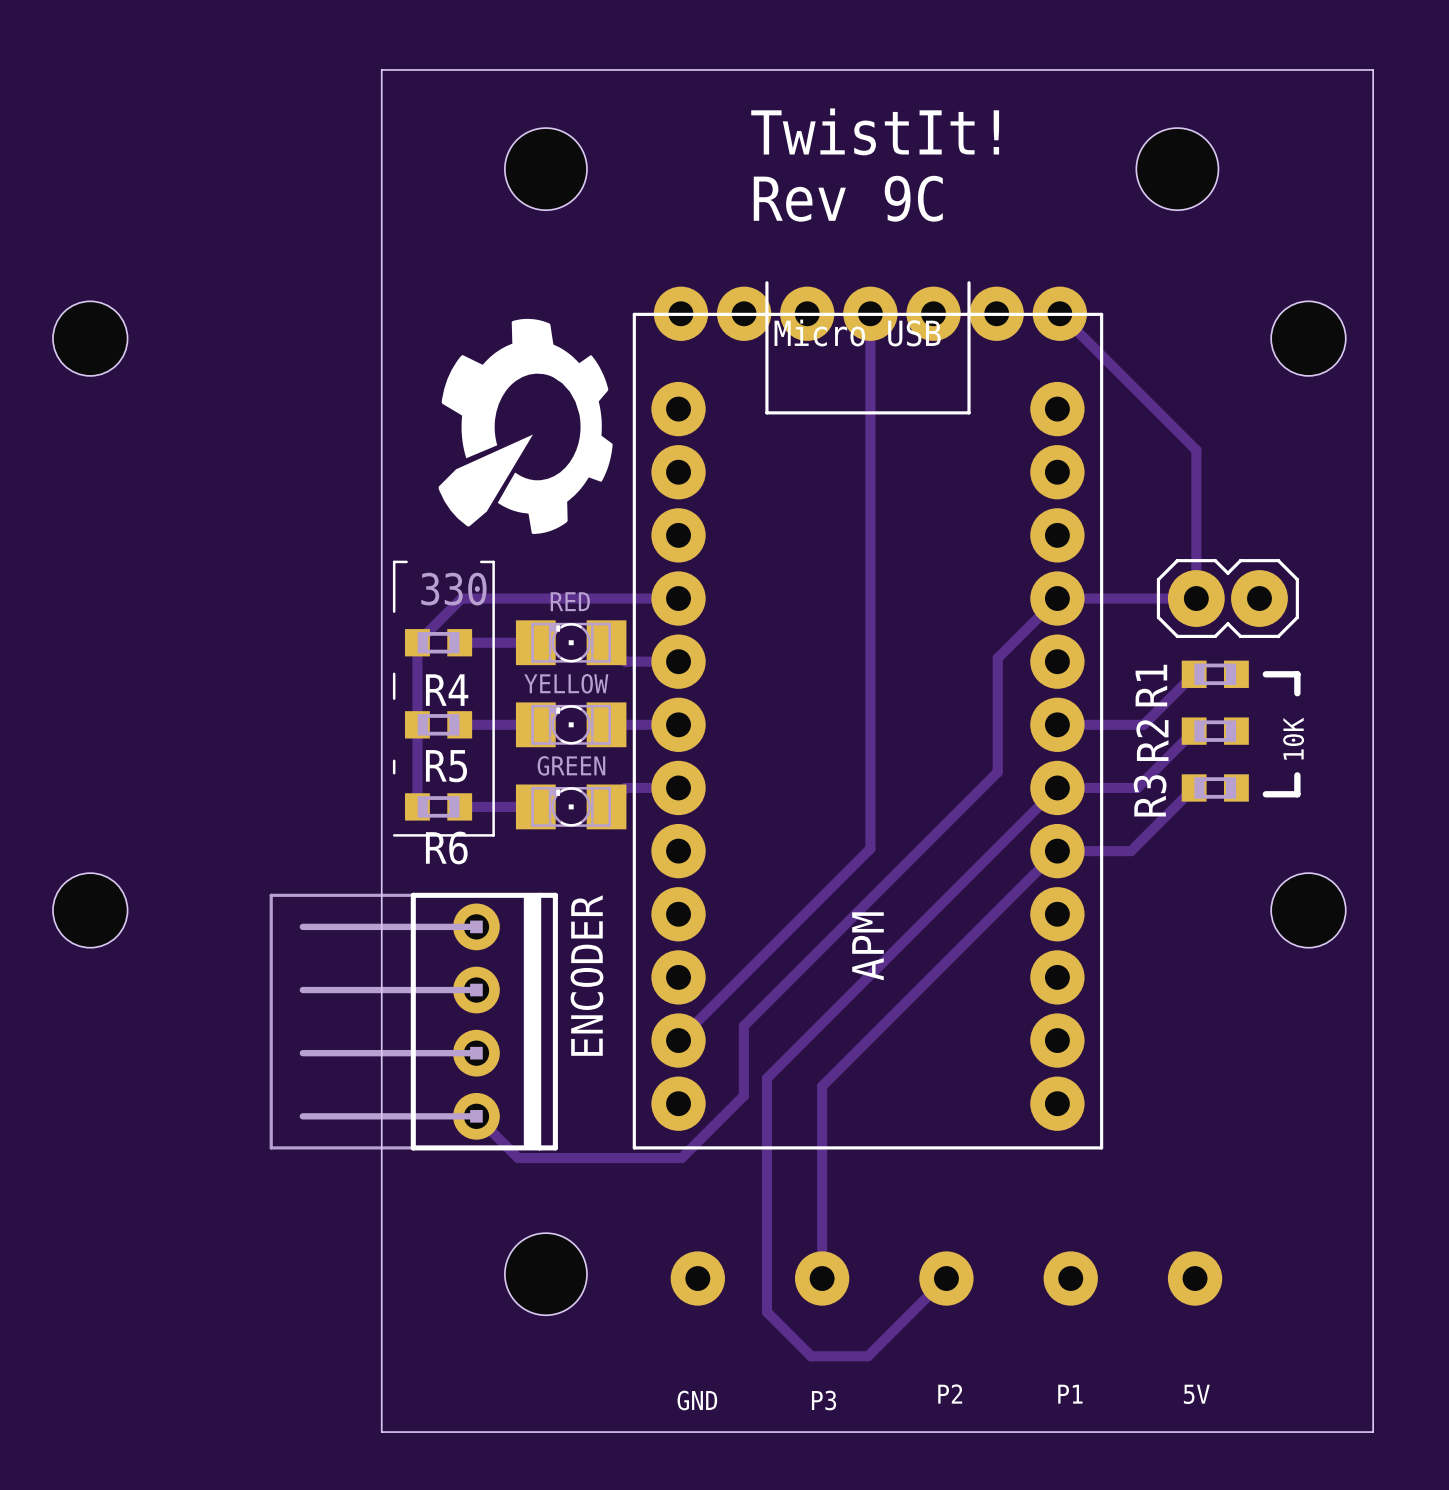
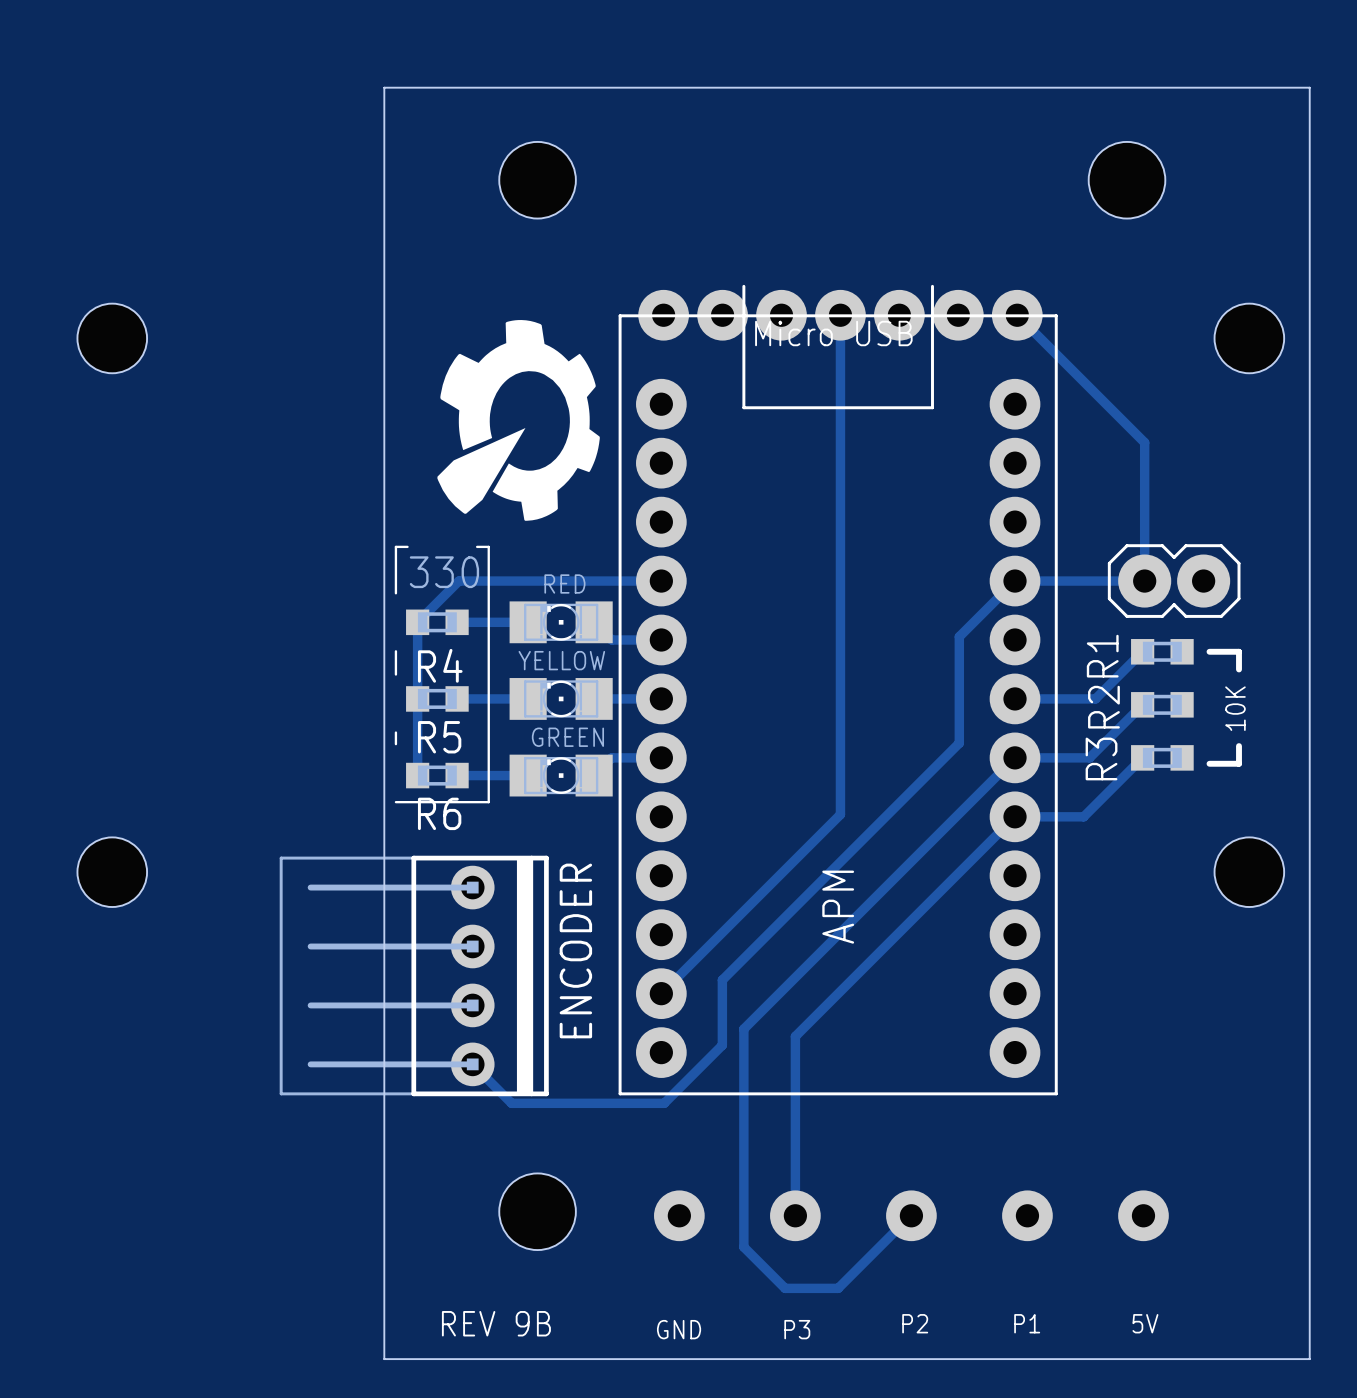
text: TwistIt! (875, 131) -> none
text: Rev 9C (848, 198) -> none
text: none -> REV 9B (496, 1323)

